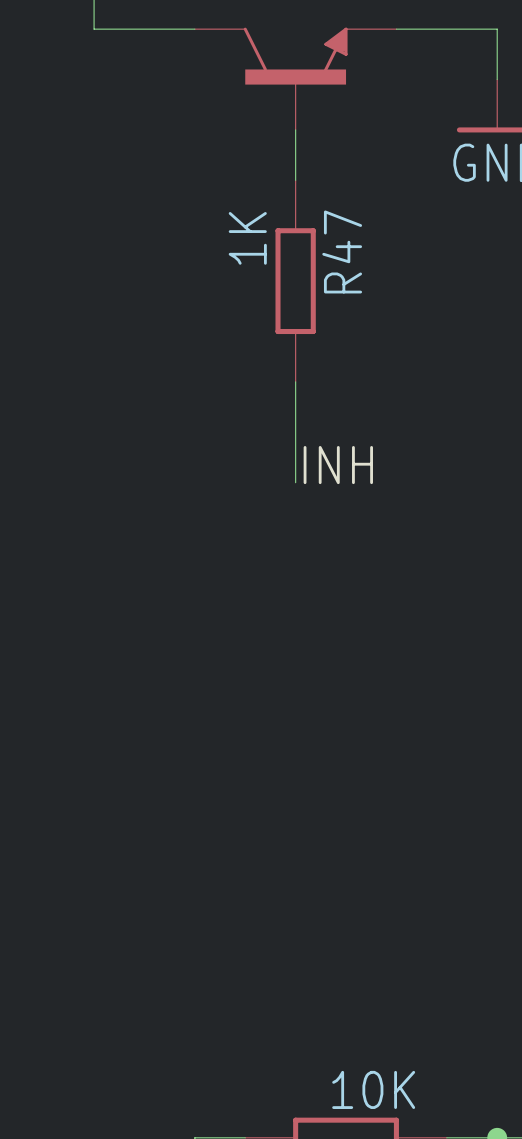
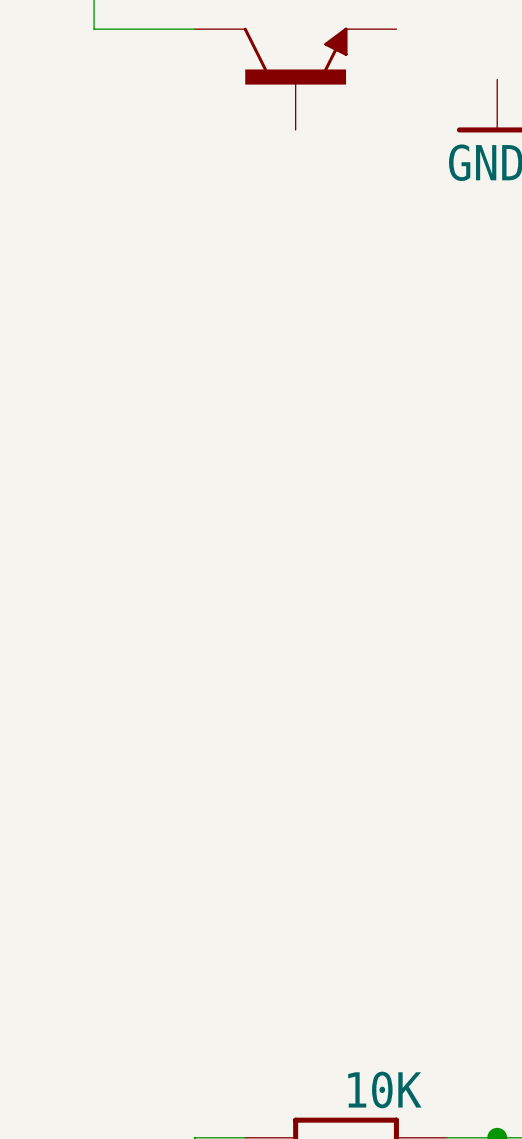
wire: (396, 29) (497, 29) (497, 79) -> none
wire: (295, 129) (295, 180) -> none
R47: 1K (295, 281) -> none
wire: (295, 381) (295, 482) -> none
label: INH (338, 465) -> none

